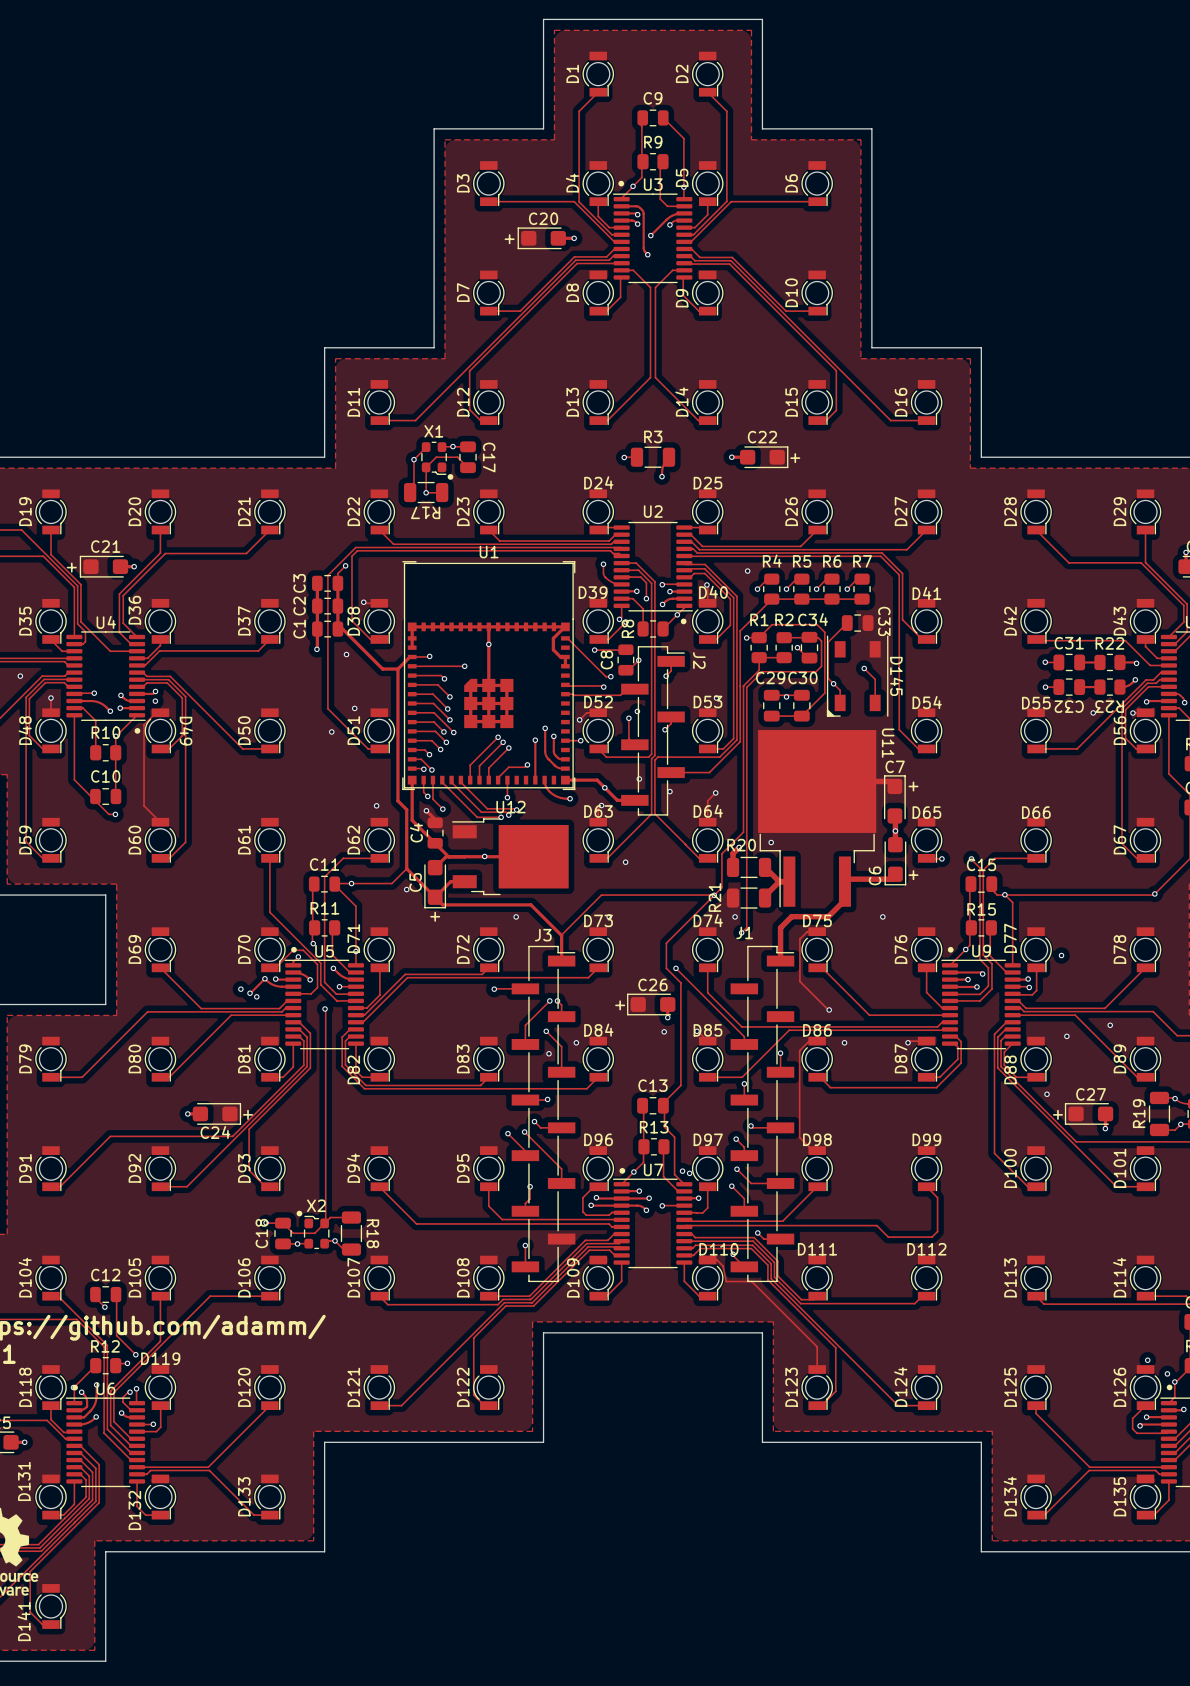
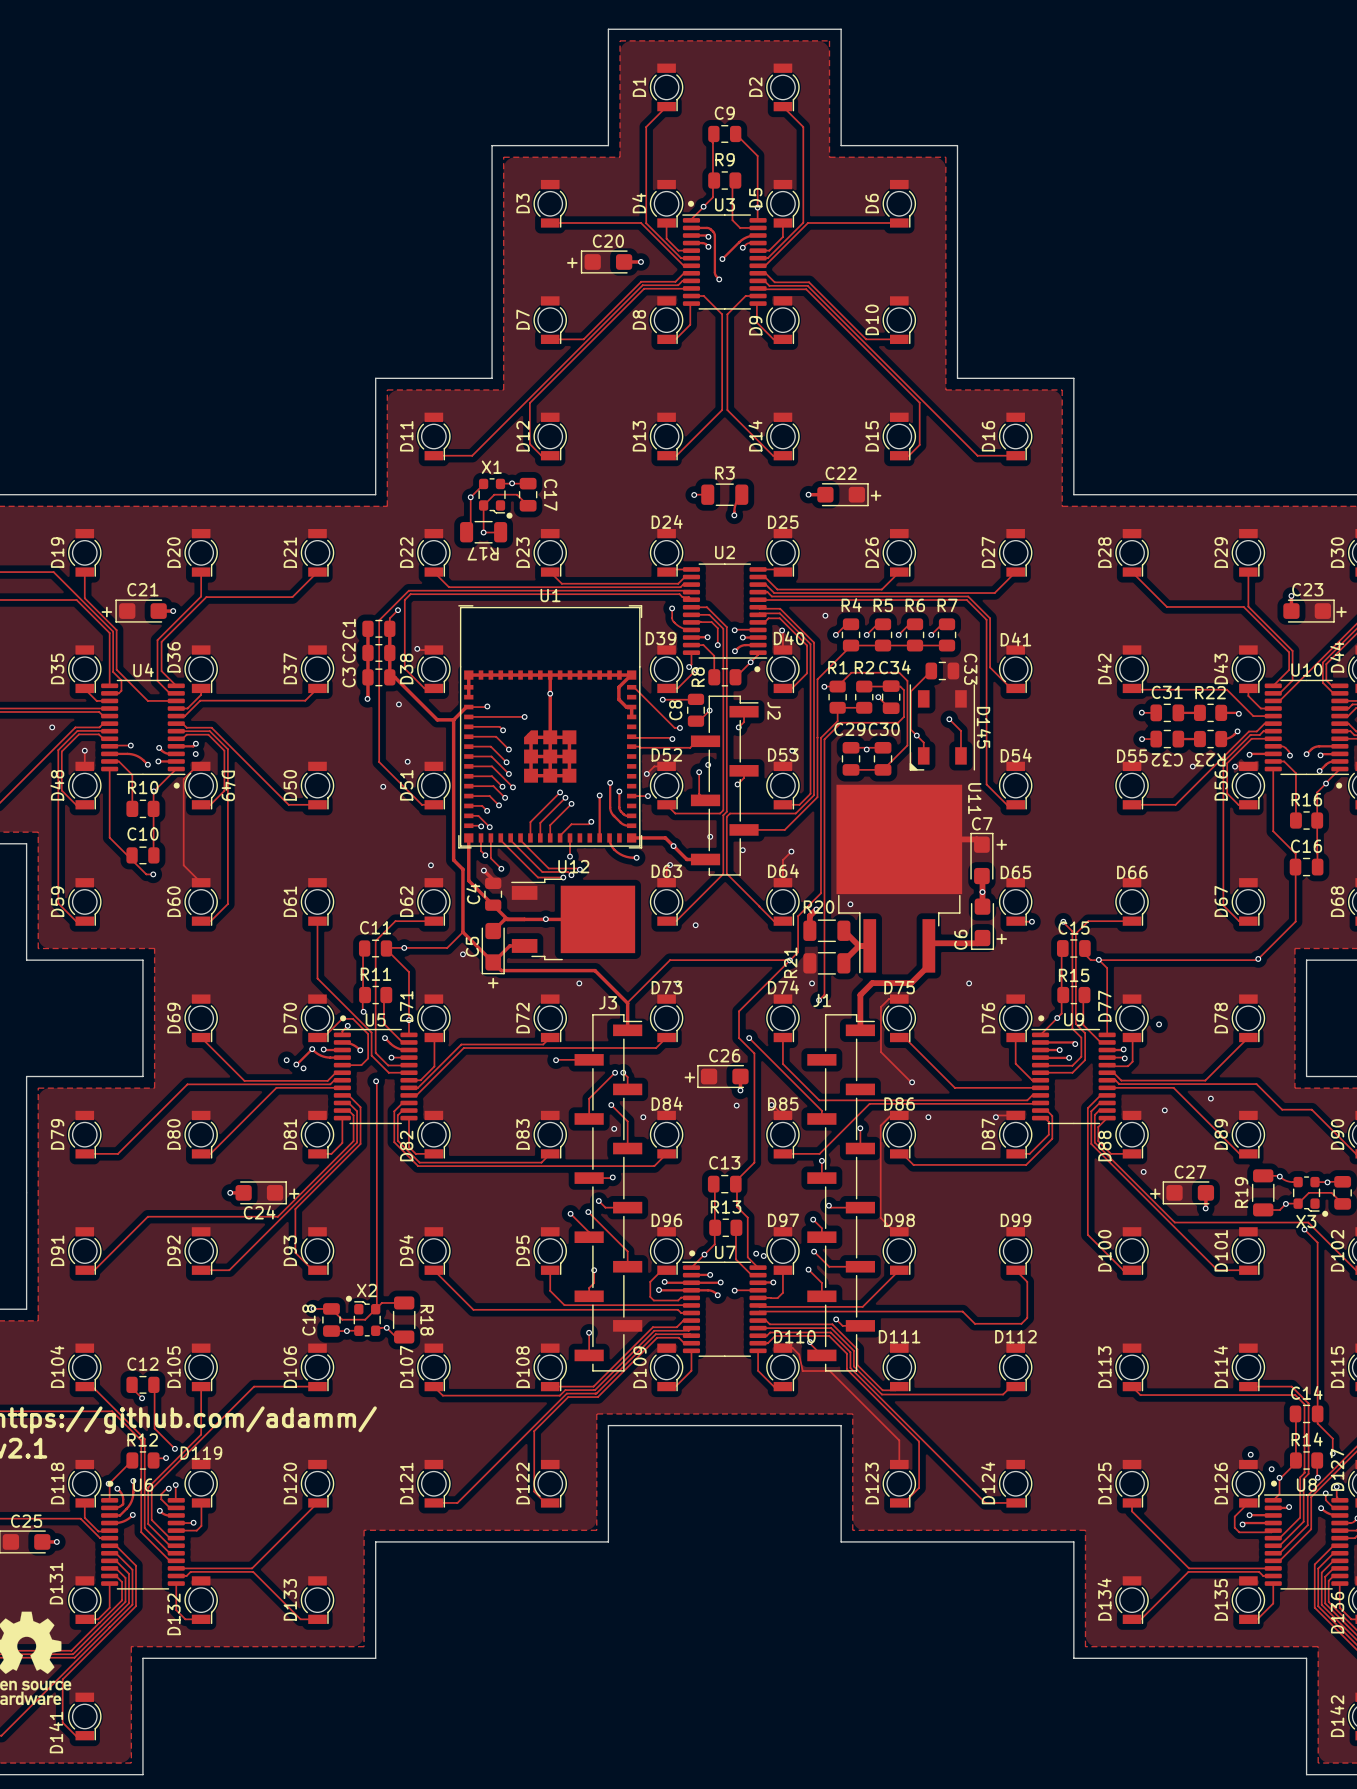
C3 name: C3 (299, 583) -> C1 (349, 628)
C1 name: C1 (299, 629) -> C3 (349, 677)

